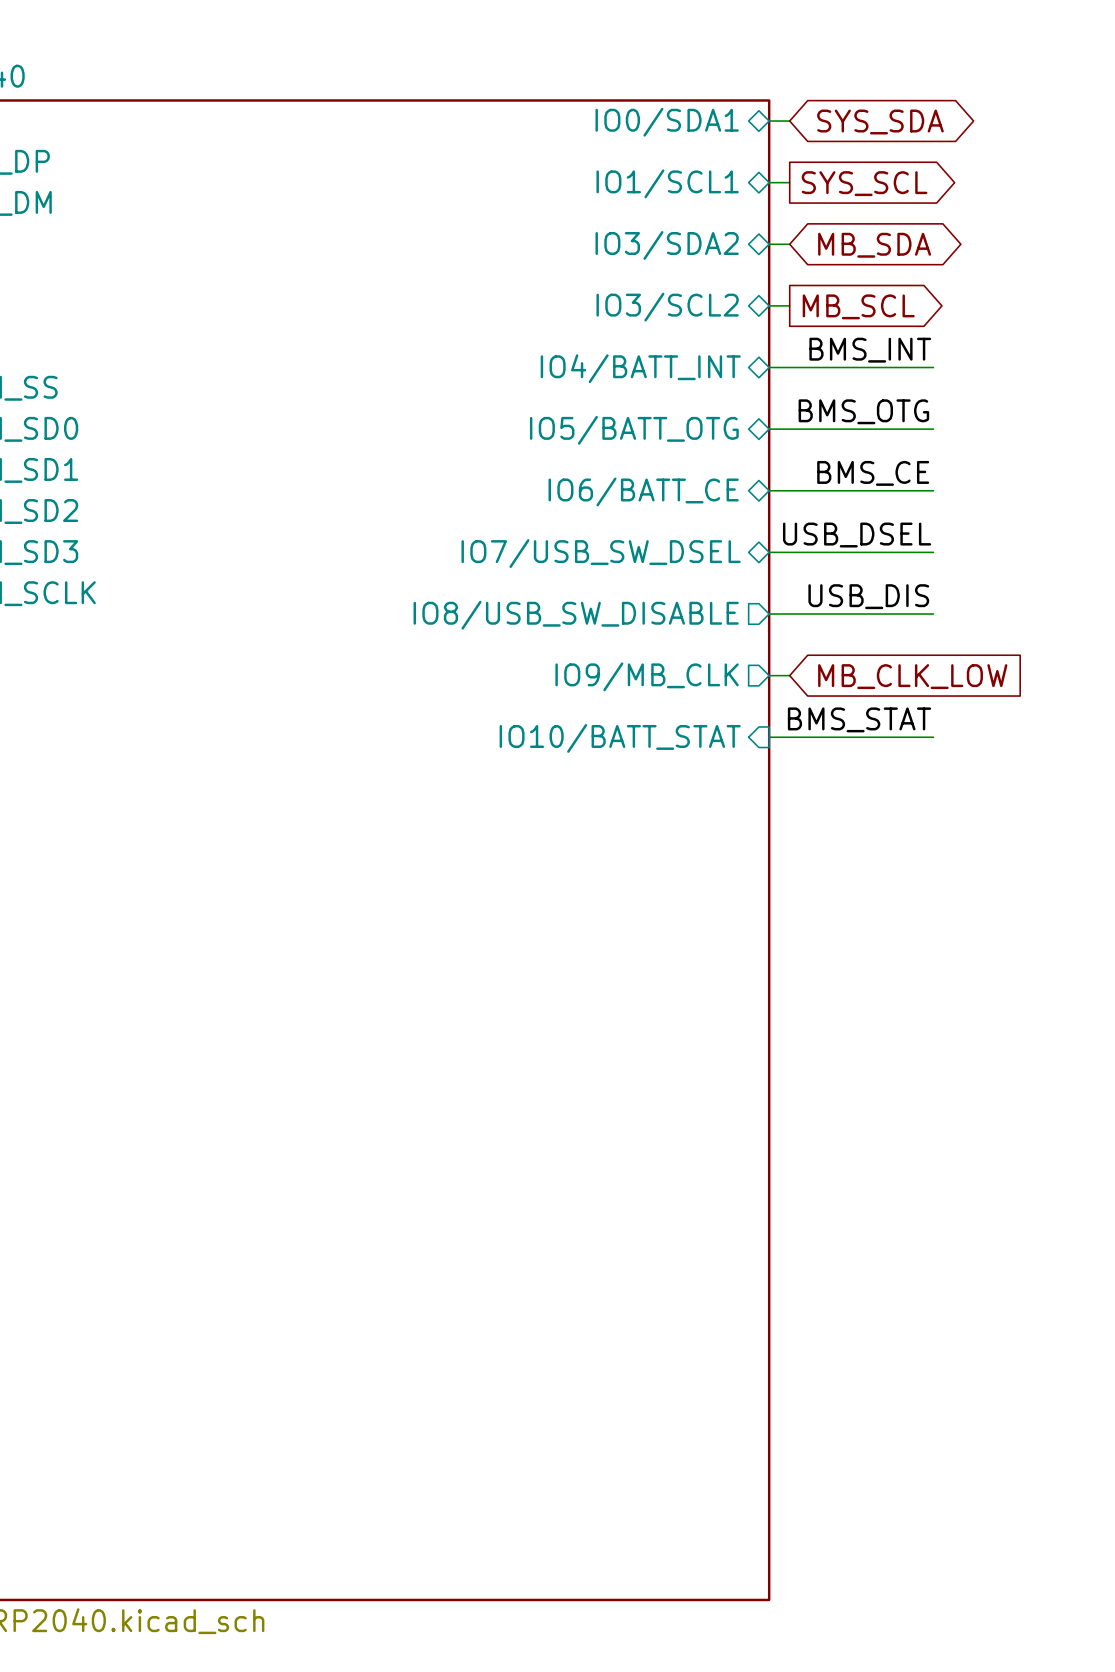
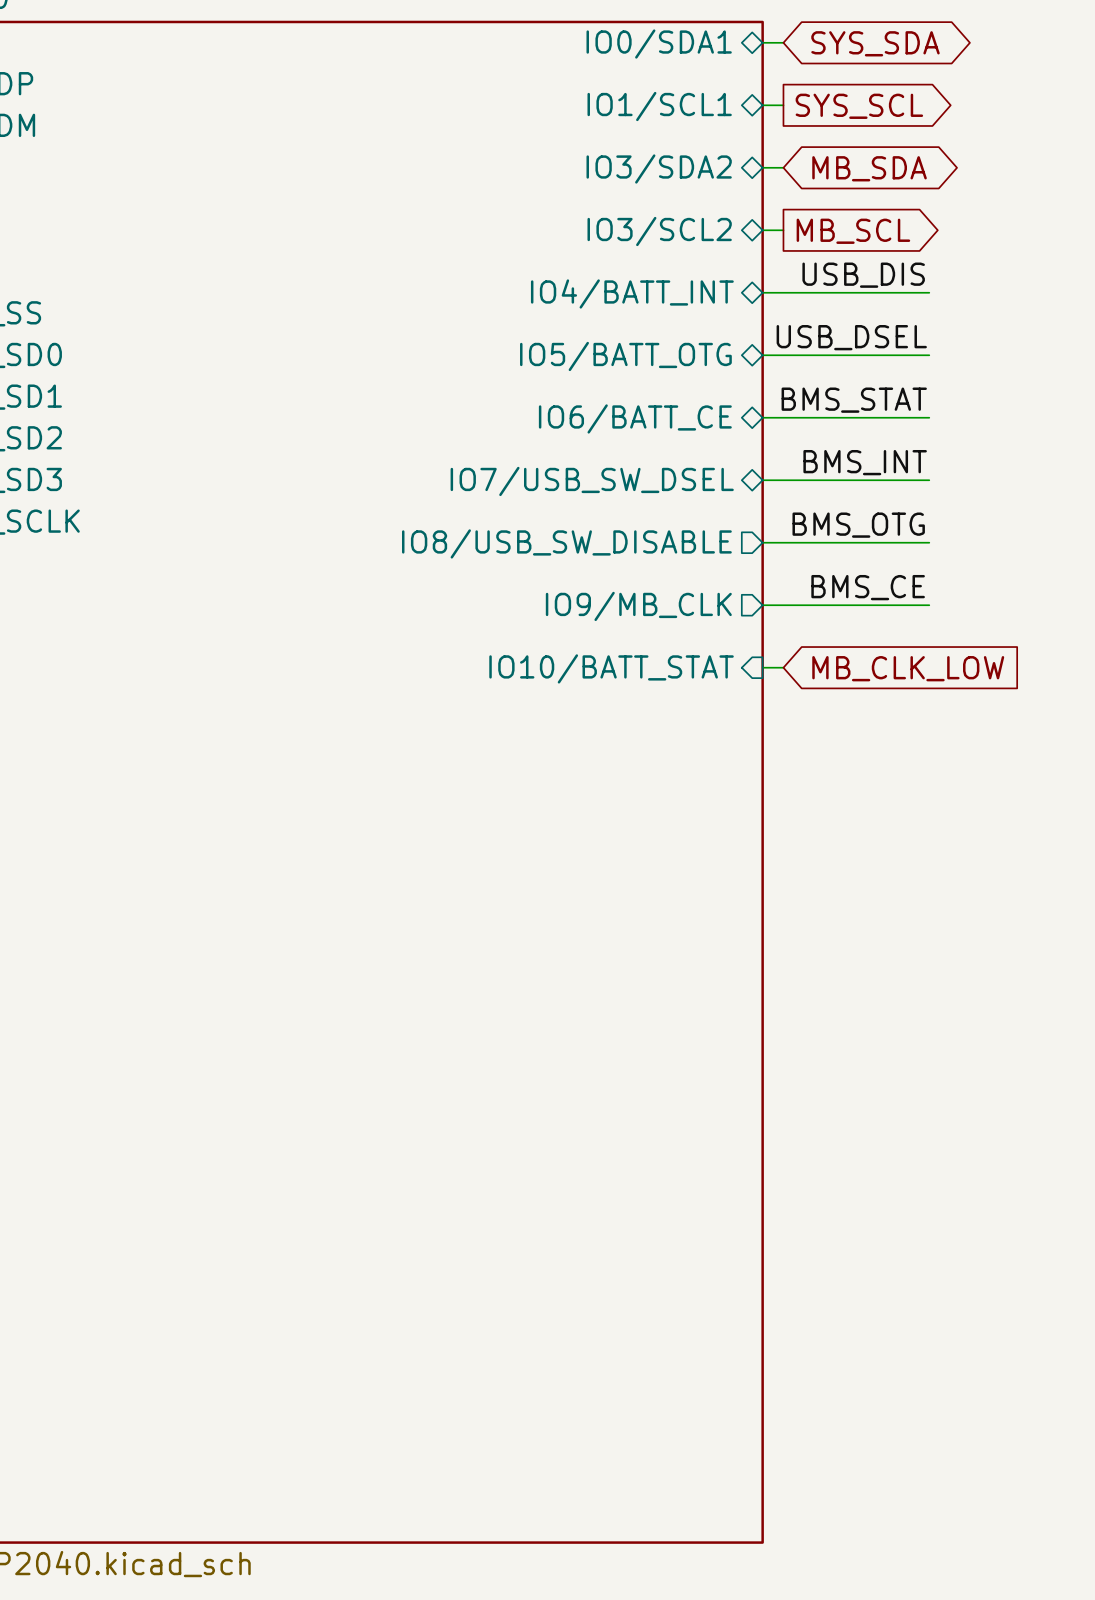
label: BMS_INT (870, 350) -> USB_DIS (863, 275)
label: BMS_OTG (863, 411) -> USB_DSEL (851, 337)
label: BMS_CE (873, 473) -> BMS_STAT (854, 400)
label: USB_DSEL (857, 535) -> BMS_INT (865, 462)
label: USB_DIS (868, 596) -> BMS_OTG (858, 525)
label: none -> BMS_CE (868, 587)
global label position: MB_CLK_LOW (912, 676) -> MB_CLK_LOW (908, 668)
label: BMS_STAT (859, 719) -> none
wire: (789, 737) (933, 737) -> (783, 605) (929, 605)

